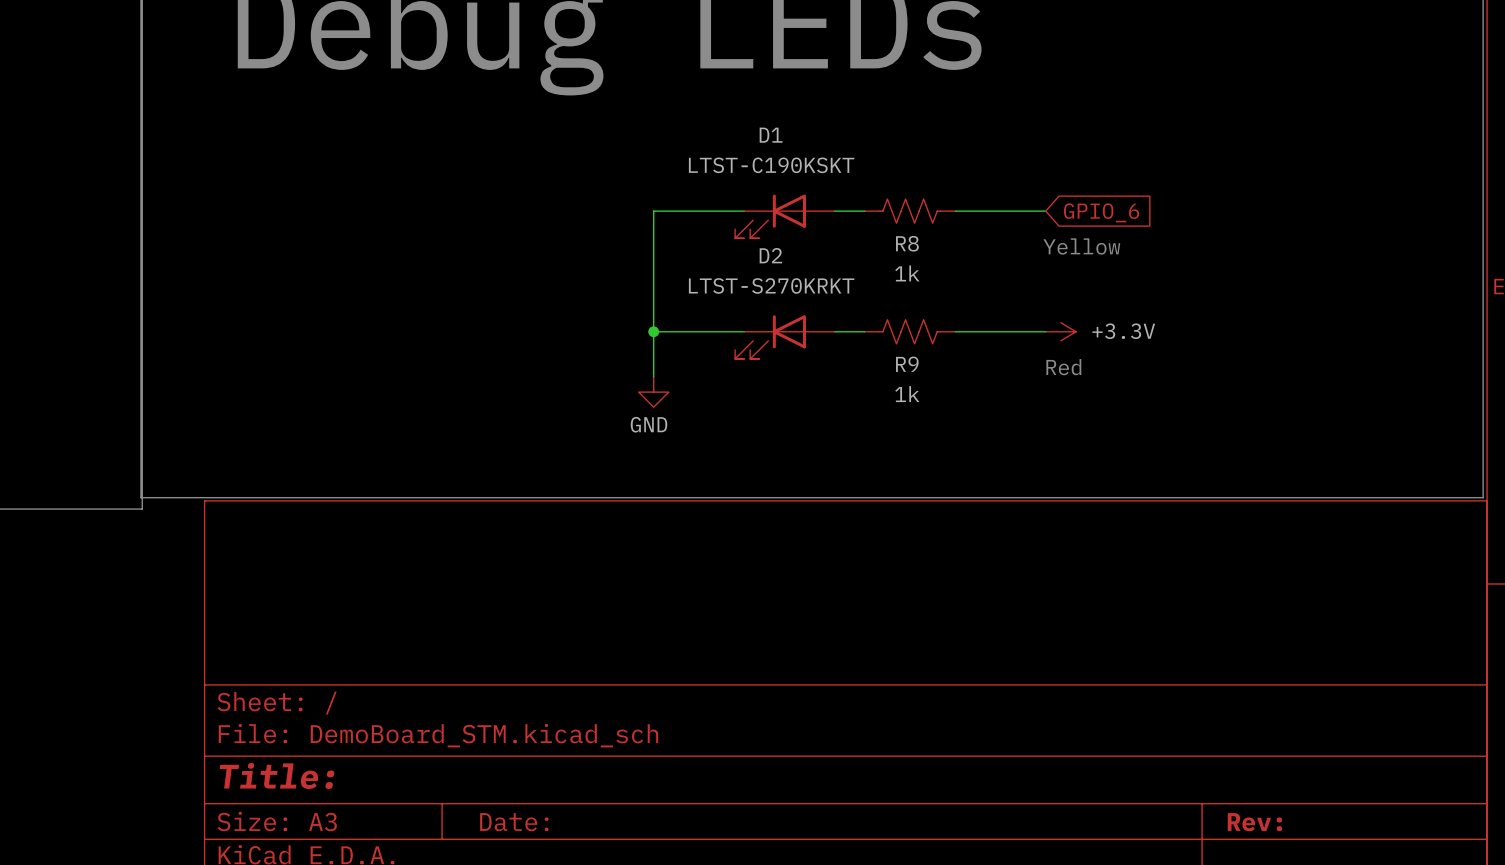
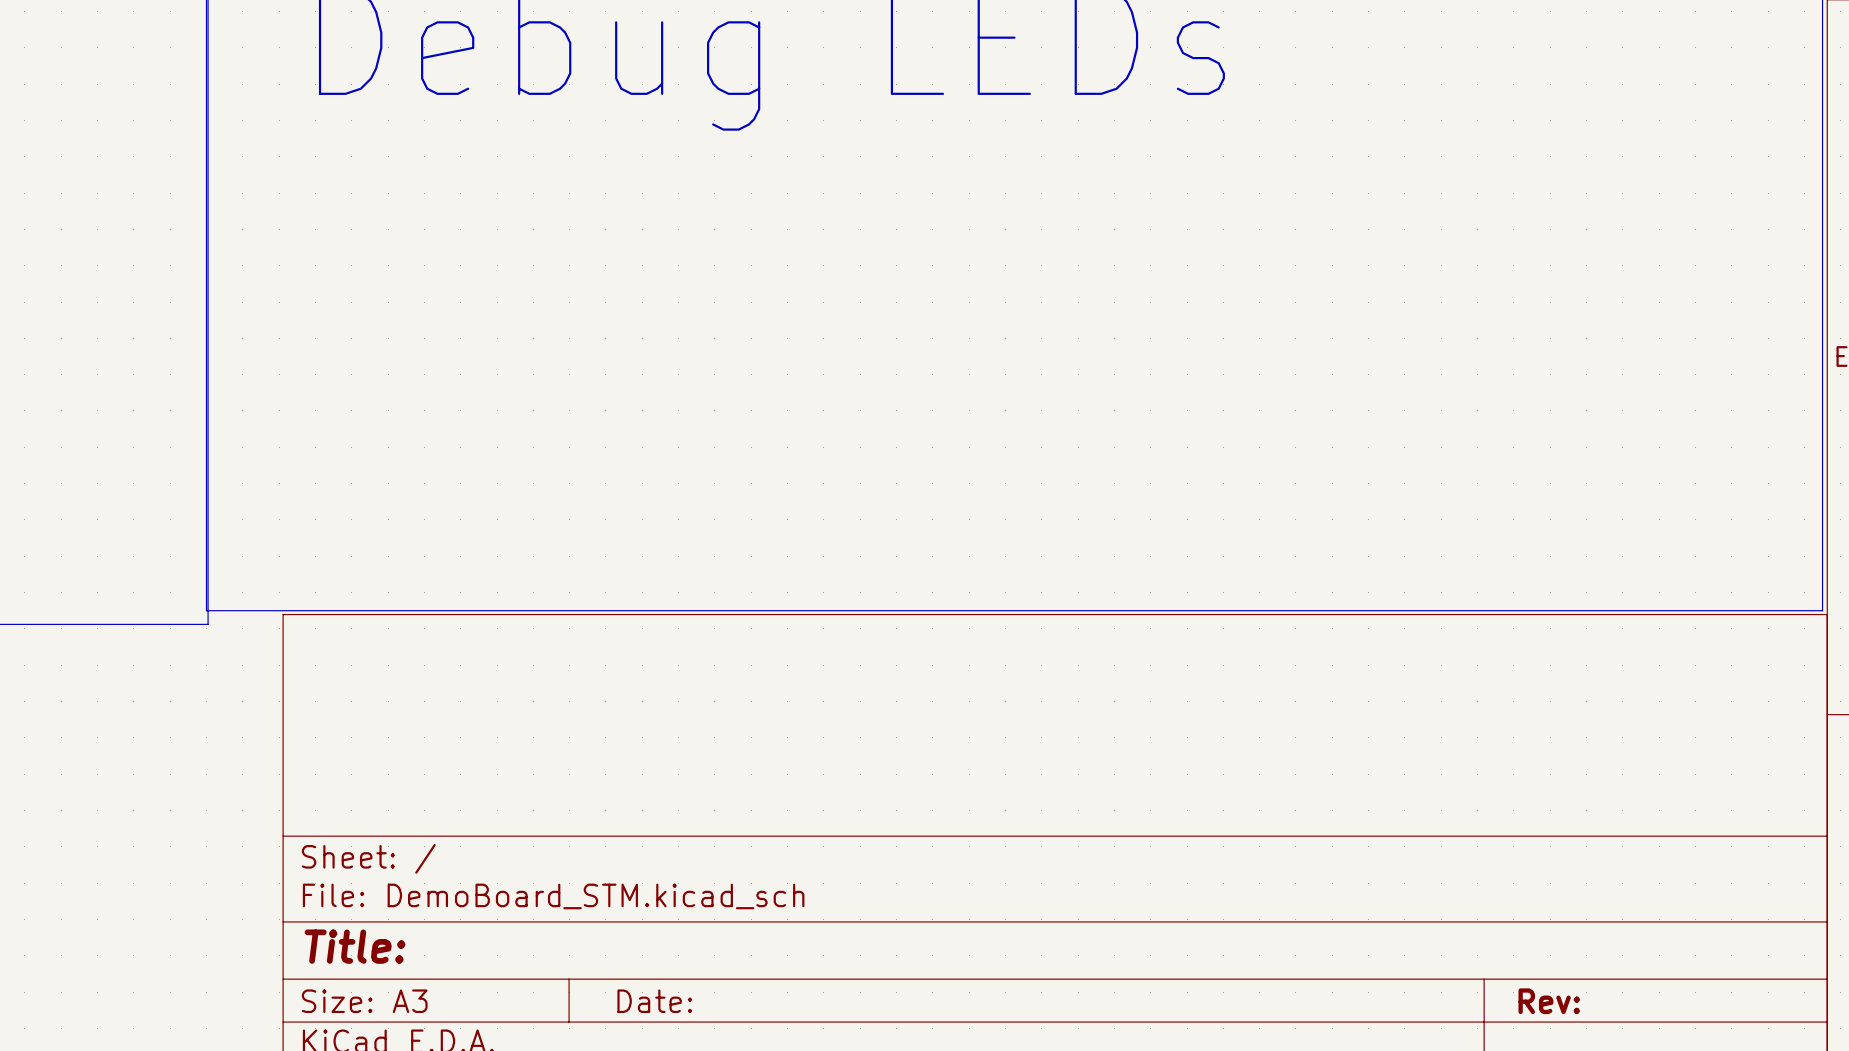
wire: (744, 211) (653, 211) (653, 377) -> none
wire: (834, 211) (864, 211) -> none
R8: 1k (910, 211) -> none
wire: (955, 211) (1045, 211) -> none
global label: GPIO_6 (1101, 212) -> none
D1: LTST-C190KSKT (784, 216) -> none
text: Yellow (1081, 246) -> none
wire: (653, 331) (744, 331) -> none
junction: (653, 331) -> none
wire: (834, 331) (864, 331) -> none
R9: 1k (910, 331) -> none
wire: (955, 331) (1045, 331) -> none
power symbol: +3.3V (1060, 331) -> none
D2: LTST-S270KRKT (784, 337) -> none
text: Red (1063, 367) -> none
power symbol: GND (653, 392) -> none

